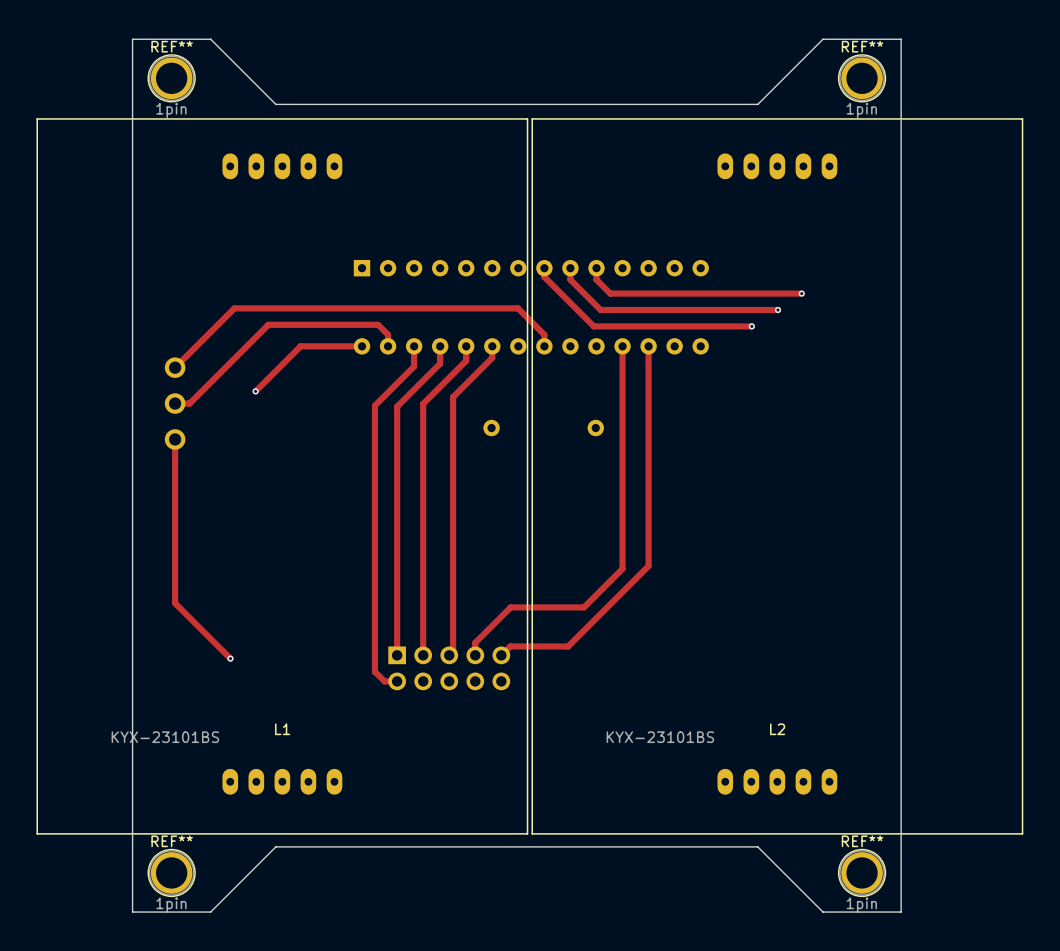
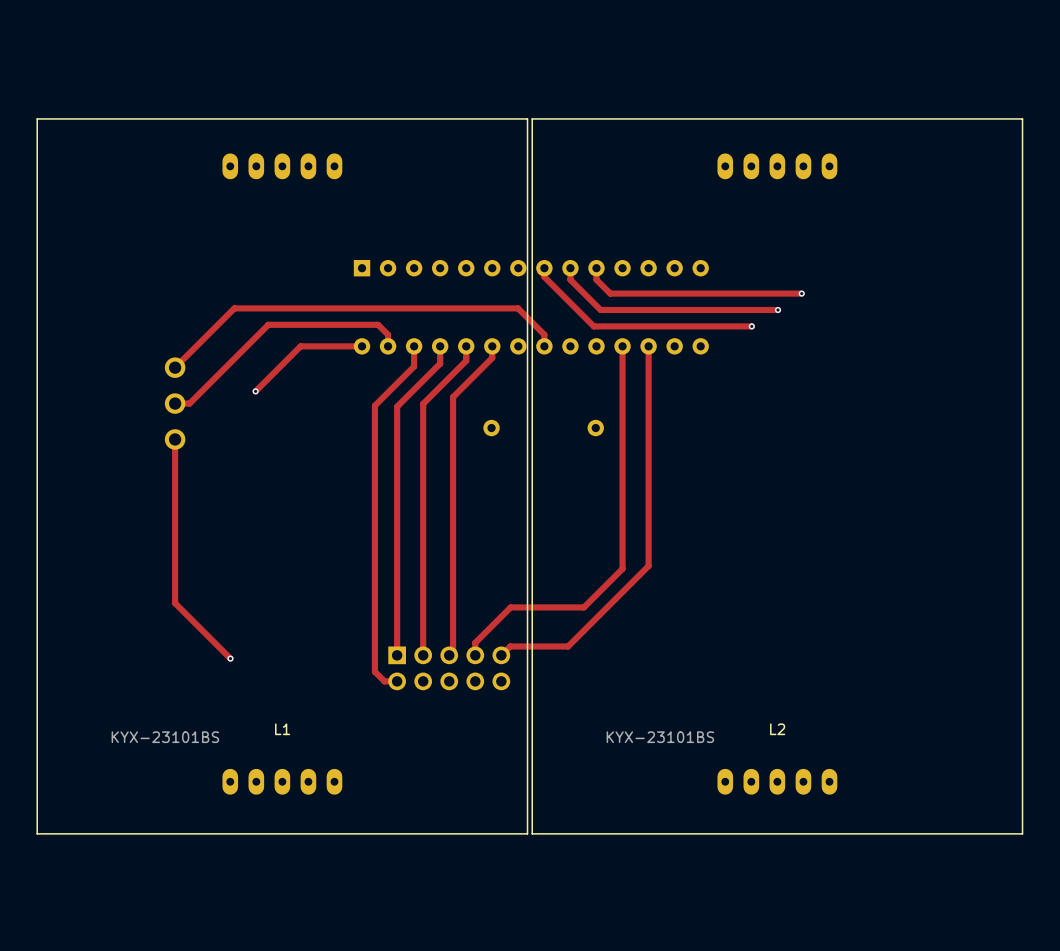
board edge: (132, 39) (210, 39) (275, 104) (757, 104) (822, 39) (901, 39) (901, 912) (822, 912) (757, 846) (275, 846) (210, 912) (132, 912) (132, 39) -> none
REF**: 1pin (171, 78) -> none
REF**: 1pin (862, 78) -> none
REF**: 1pin (171, 872) -> none
REF**: 1pin (862, 872) -> none

